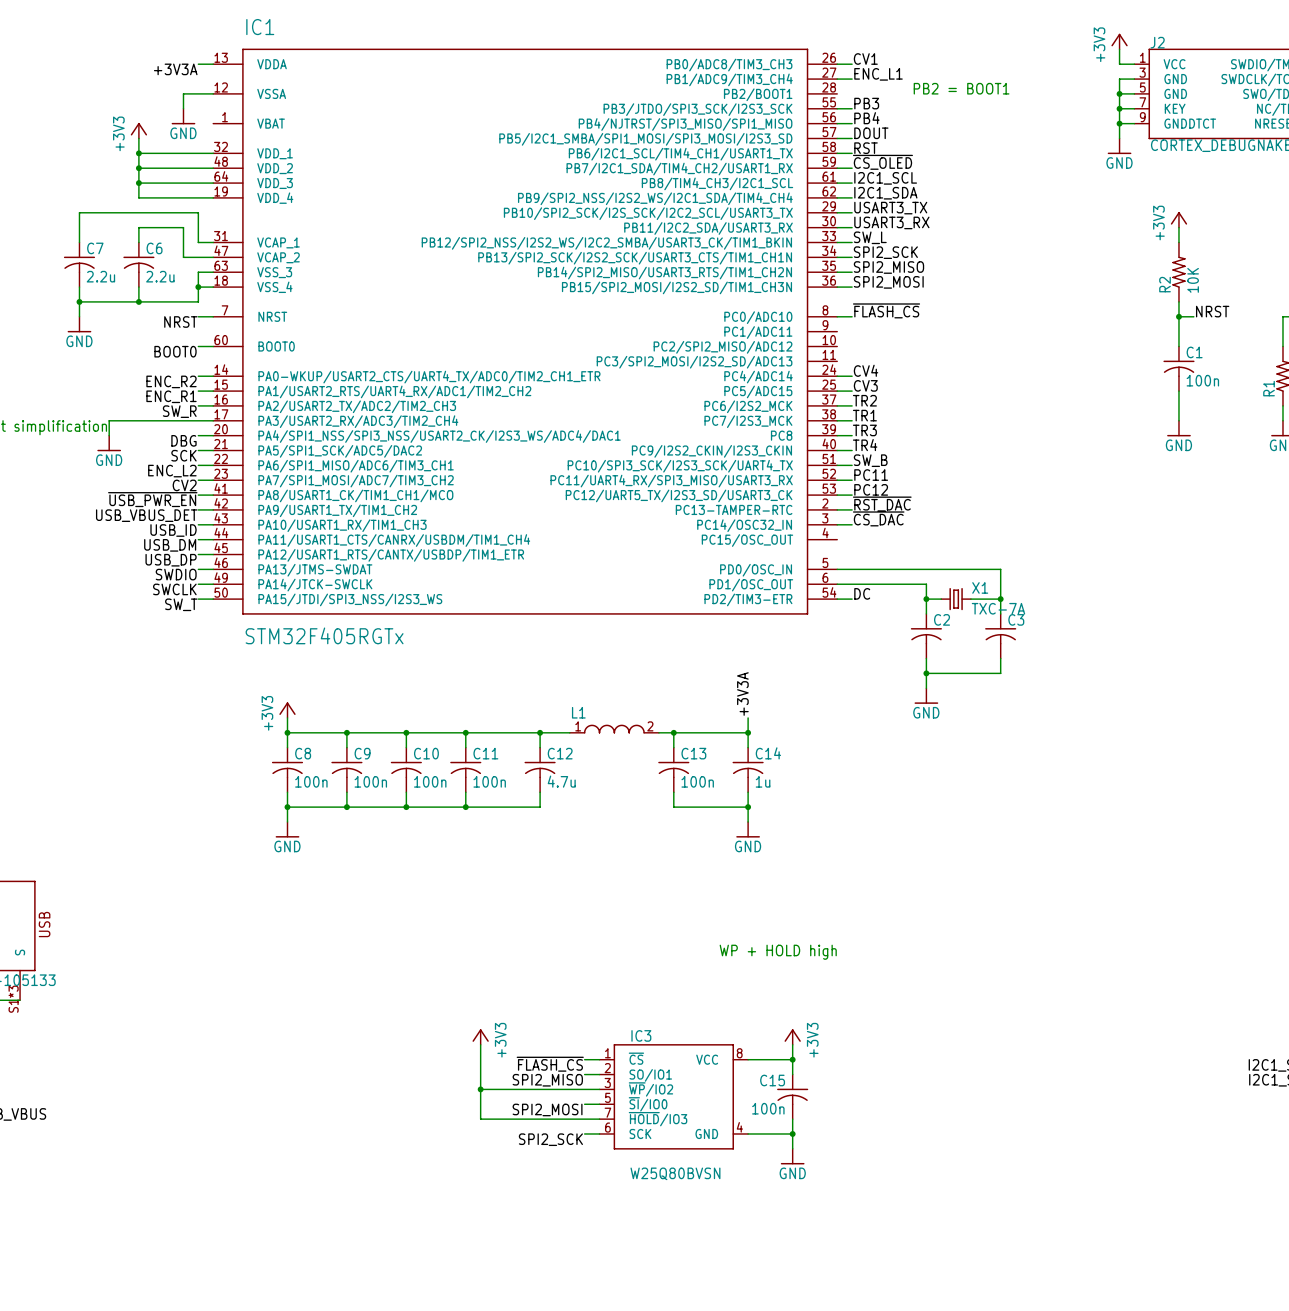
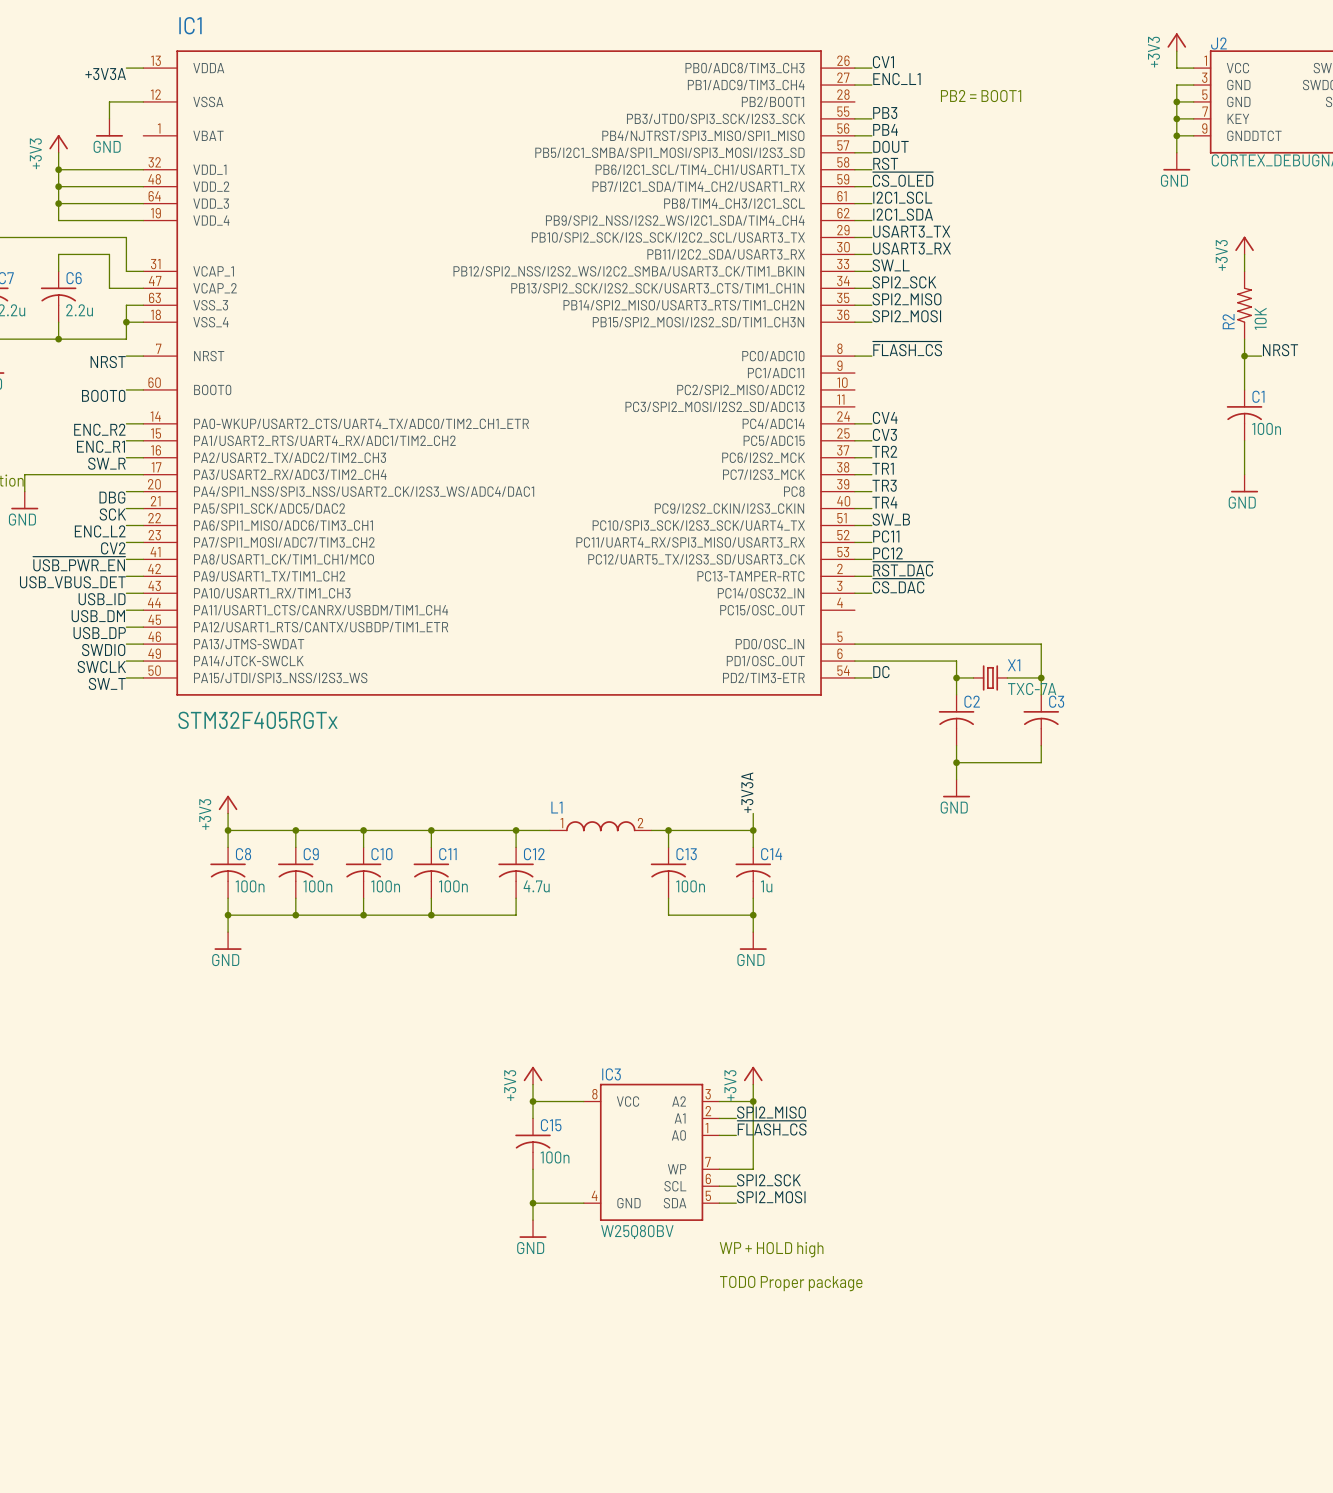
text: WP + HOLD high (778, 952) -> none
wire: none -> (533, 1084) (533, 1118)
wire: none -> (753, 1084) (753, 1169) (719, 1169)
wire: none -> (533, 1101) (583, 1101)
junction: none -> (533, 1101)
wire: none -> (719, 1101) (753, 1101)
junction: none -> (753, 1101)
label: none -> SPI2_MISO (771, 1112)
wire: none -> (719, 1118) (736, 1118)
label: none -> ~{FLASH_CS} (771, 1128)
wire: none -> (719, 1135) (736, 1135)
wire: none -> (533, 1169) (533, 1220)
power symbol position: +3V3 (480, 1037) -> +3V3 (533, 1075)
power symbol position: +3V3 (792, 1037) -> +3V3 (753, 1075)
power symbol text position: +3V3 (500, 1040) -> +3V3 (510, 1085)
label: none -> SPI2_SCK (768, 1180)
power symbol text position: +3V3 (812, 1040) -> +3V3 (730, 1085)
wire: (480, 1044) (480, 1119) (599, 1119) -> none
IC3 symbol: [599, 1044, 749, 1150] -> [583, 1083, 720, 1221]
wire: (792, 1044) (792, 1074) -> none
label: none -> SPI2_MOSI (771, 1197)
wire: none -> (533, 1203) (566, 1203)
junction: none -> (533, 1203)
wire: (748, 1059) (792, 1059) -> none
junction: (792, 1059) -> none
label: ~{FLASH_CS} (550, 1064) -> none
wire: (584, 1074) (599, 1074) -> (719, 1203) (736, 1203)
label: SPI2_MISO (547, 1080) -> none
C15 name position: C15 (772, 1080) -> C15 (551, 1125)
power symbol: none -> GND (533, 1229)
wire: (480, 1089) (599, 1089) -> none
junction: (480, 1089) -> none
C15 position: (792, 1096) -> (533, 1143)
text: none -> WP + HOLD high (771, 1249)
wire: (584, 1104) (599, 1104) -> none
C15 value position: 100n (768, 1108) -> 100n (555, 1157)
label: SPI2_MOSI (547, 1109) -> none
wire: (792, 1119) (792, 1148) -> none
text: none -> TODO Proper package (791, 1283)
wire: (584, 1133) (599, 1133) -> none
wire: (748, 1133) (792, 1133) -> none
junction: (792, 1133) -> none
label: SPI2_SCK (550, 1139) -> none
power symbol: GND (792, 1156) -> none
IC3 value: W25Q80BVSN (675, 1173) -> W25Q80BV (637, 1232)

